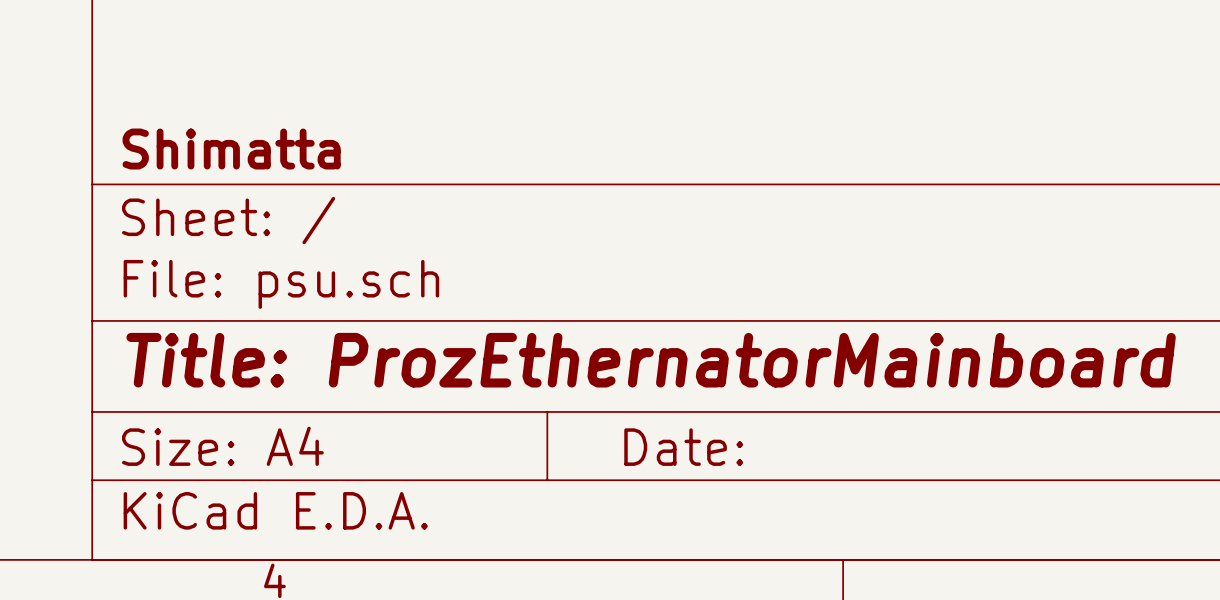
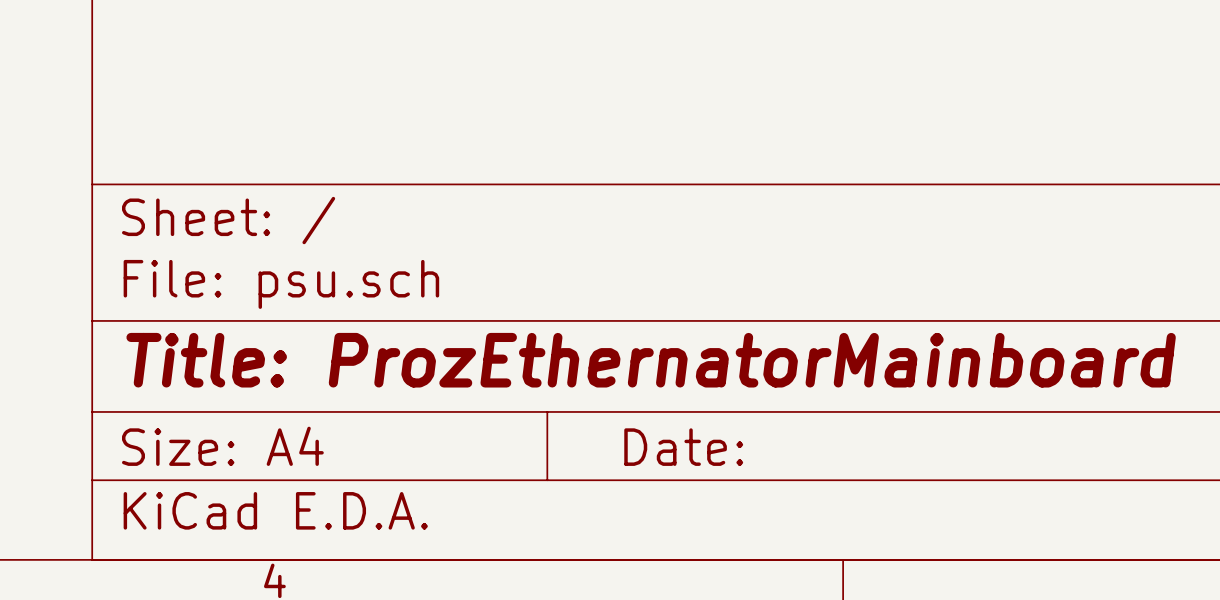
title block: Shimatta (231, 149) -> none

